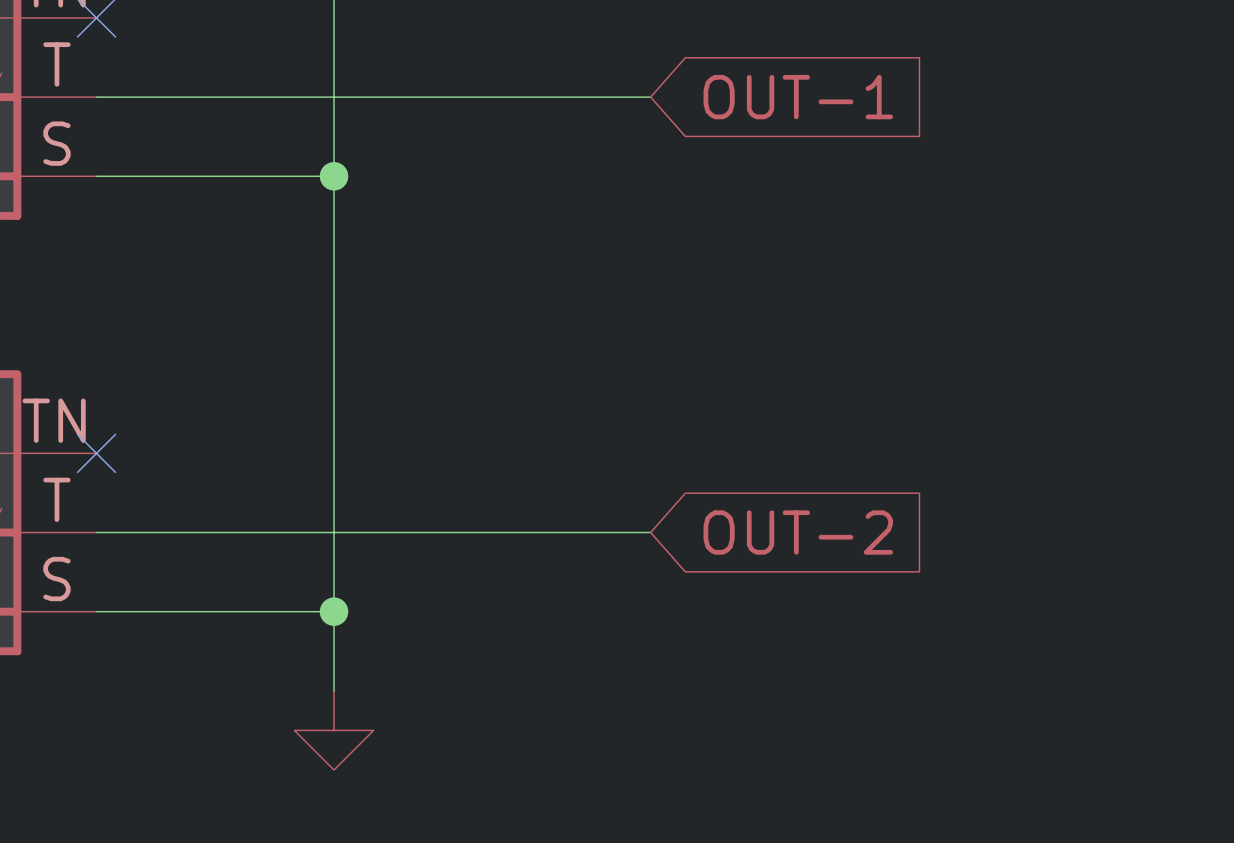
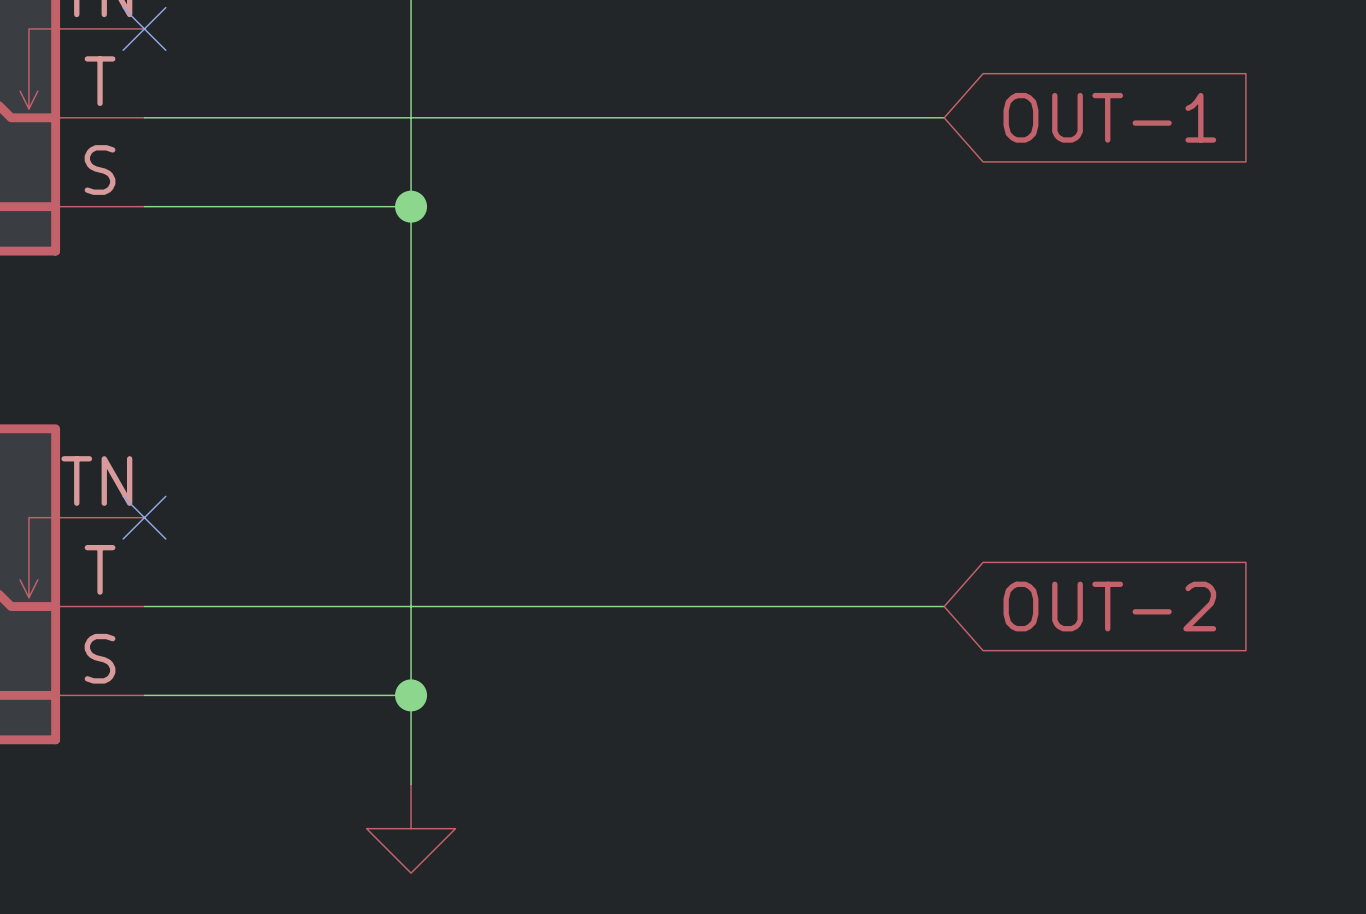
wire: none -> (766, 117) (944, 117)
global label position: OUT-1 (798, 97) -> OUT-1 (1109, 117)
wire: none -> (766, 606) (944, 606)
global label position: OUT-2 (798, 532) -> OUT-2 (1109, 606)

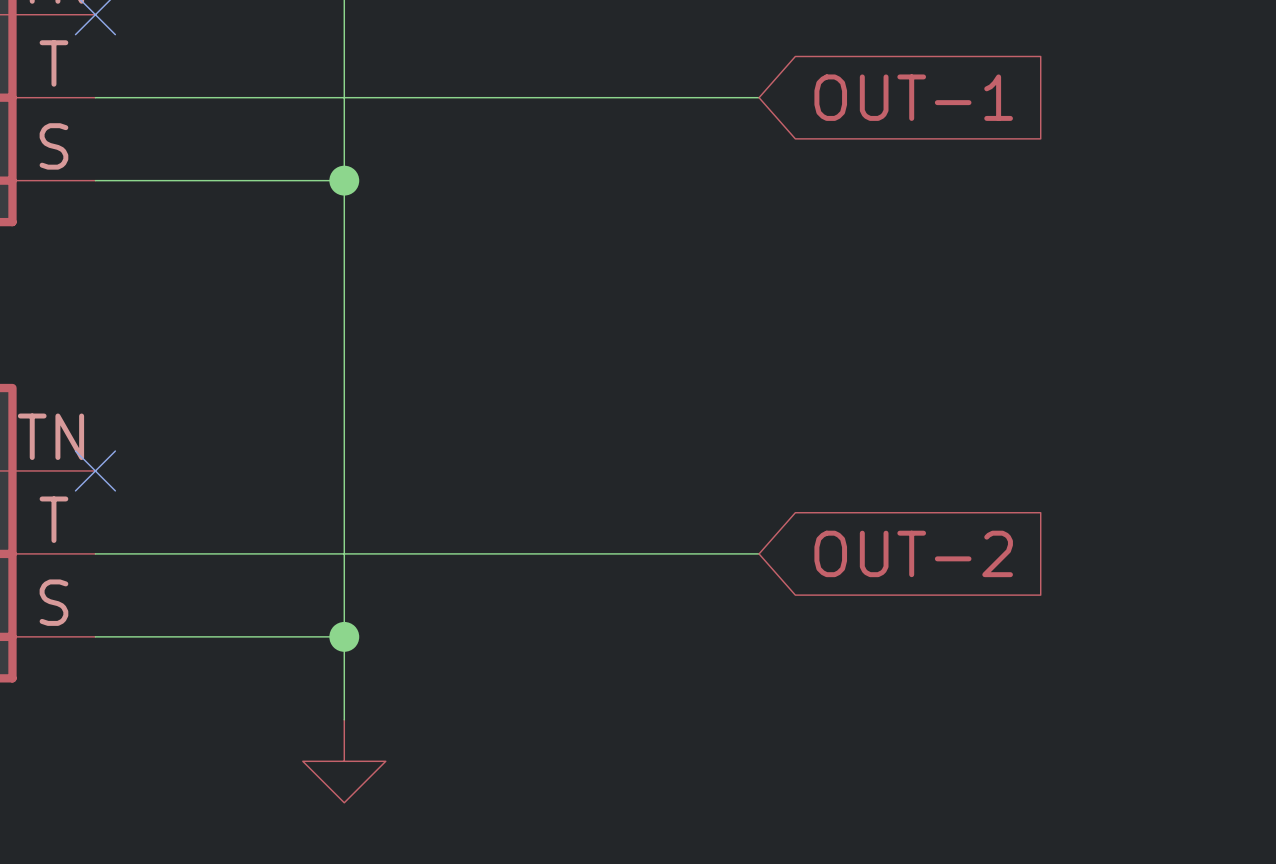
wire: (855, 117) (944, 117) -> none
global label position: OUT-1 (1109, 117) -> OUT-1 (913, 97)
wire: (855, 606) (944, 606) -> none
global label position: OUT-2 (1109, 606) -> OUT-2 (913, 553)

